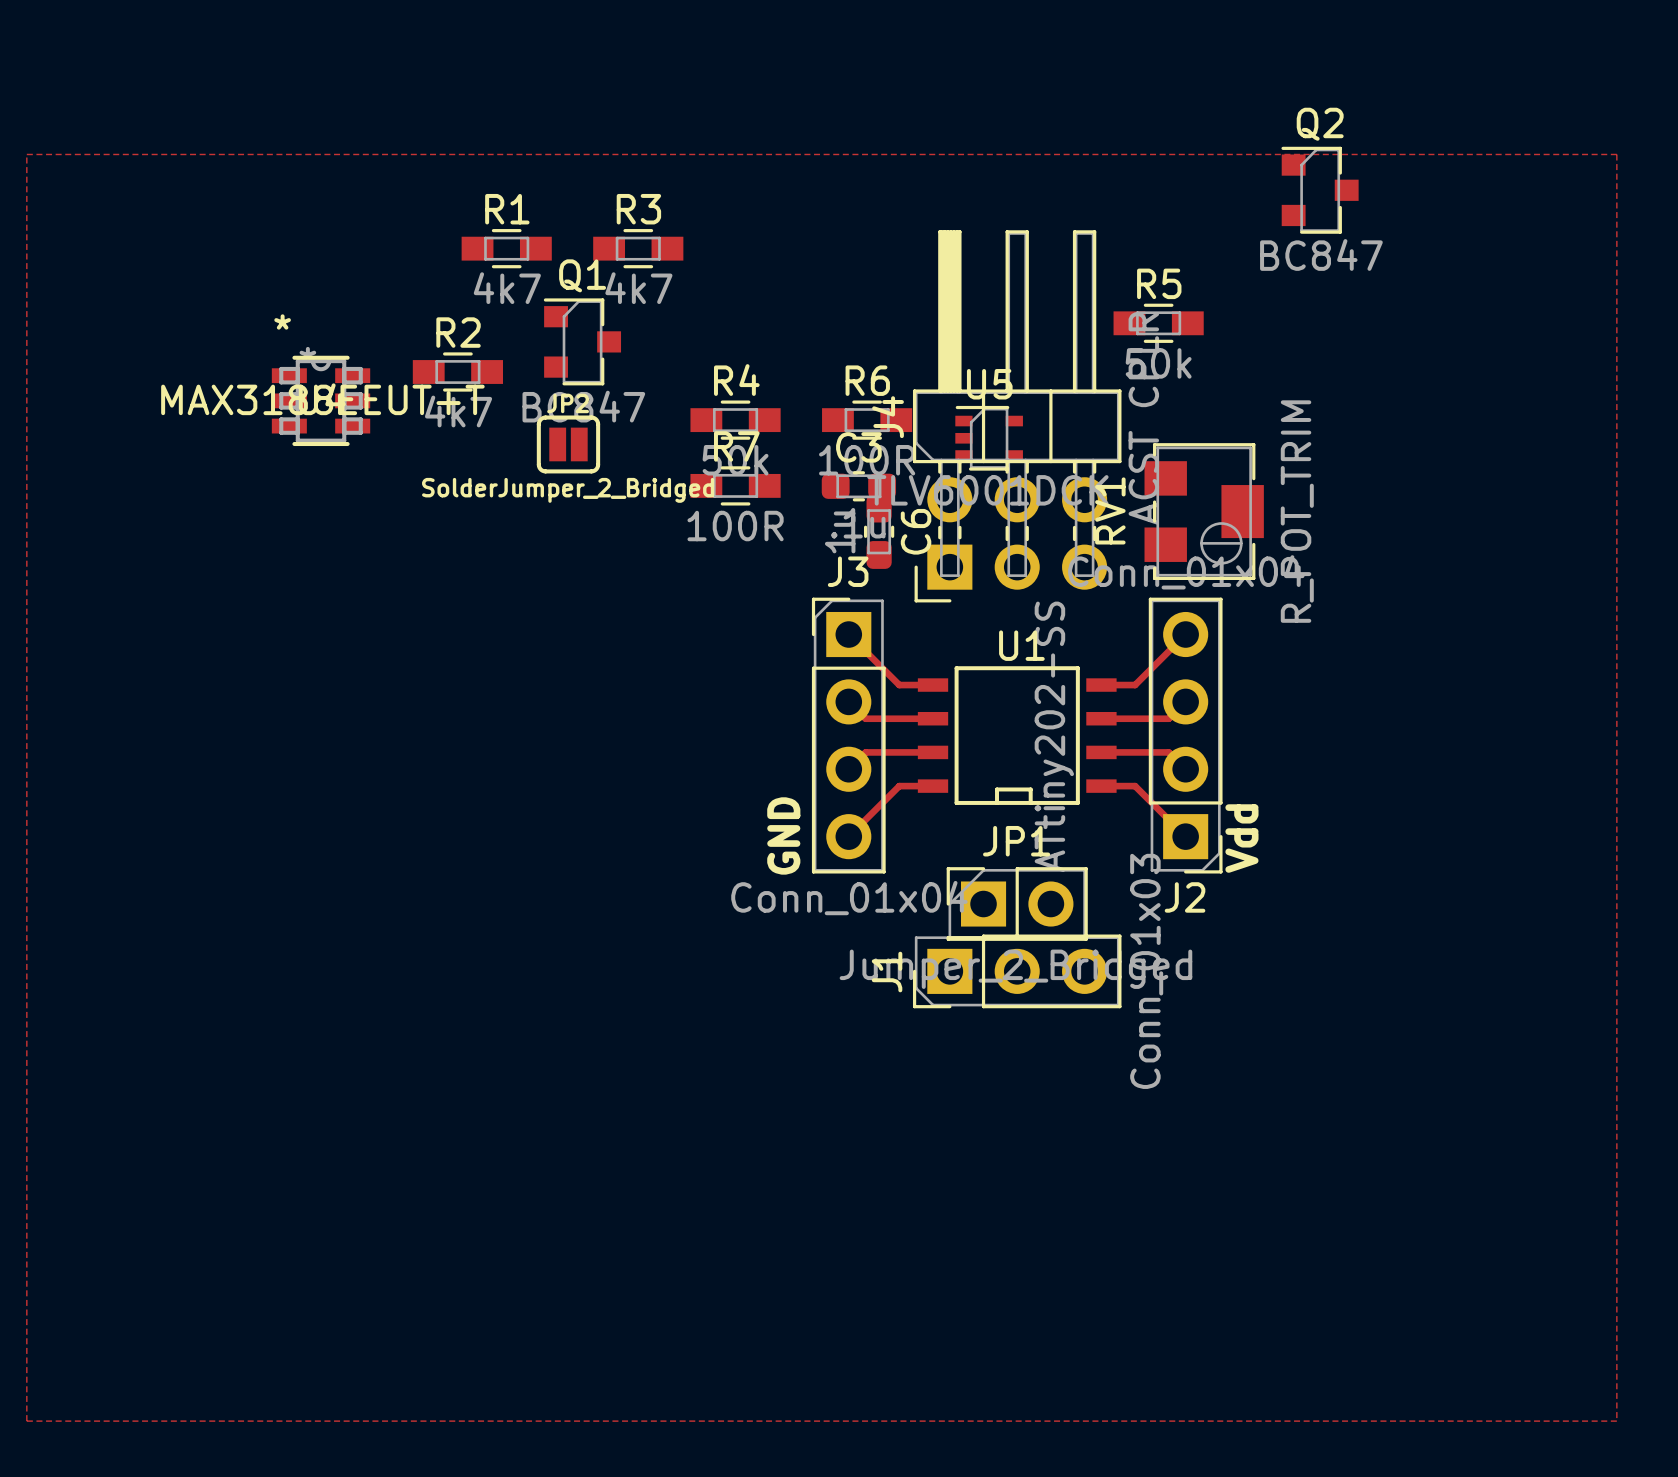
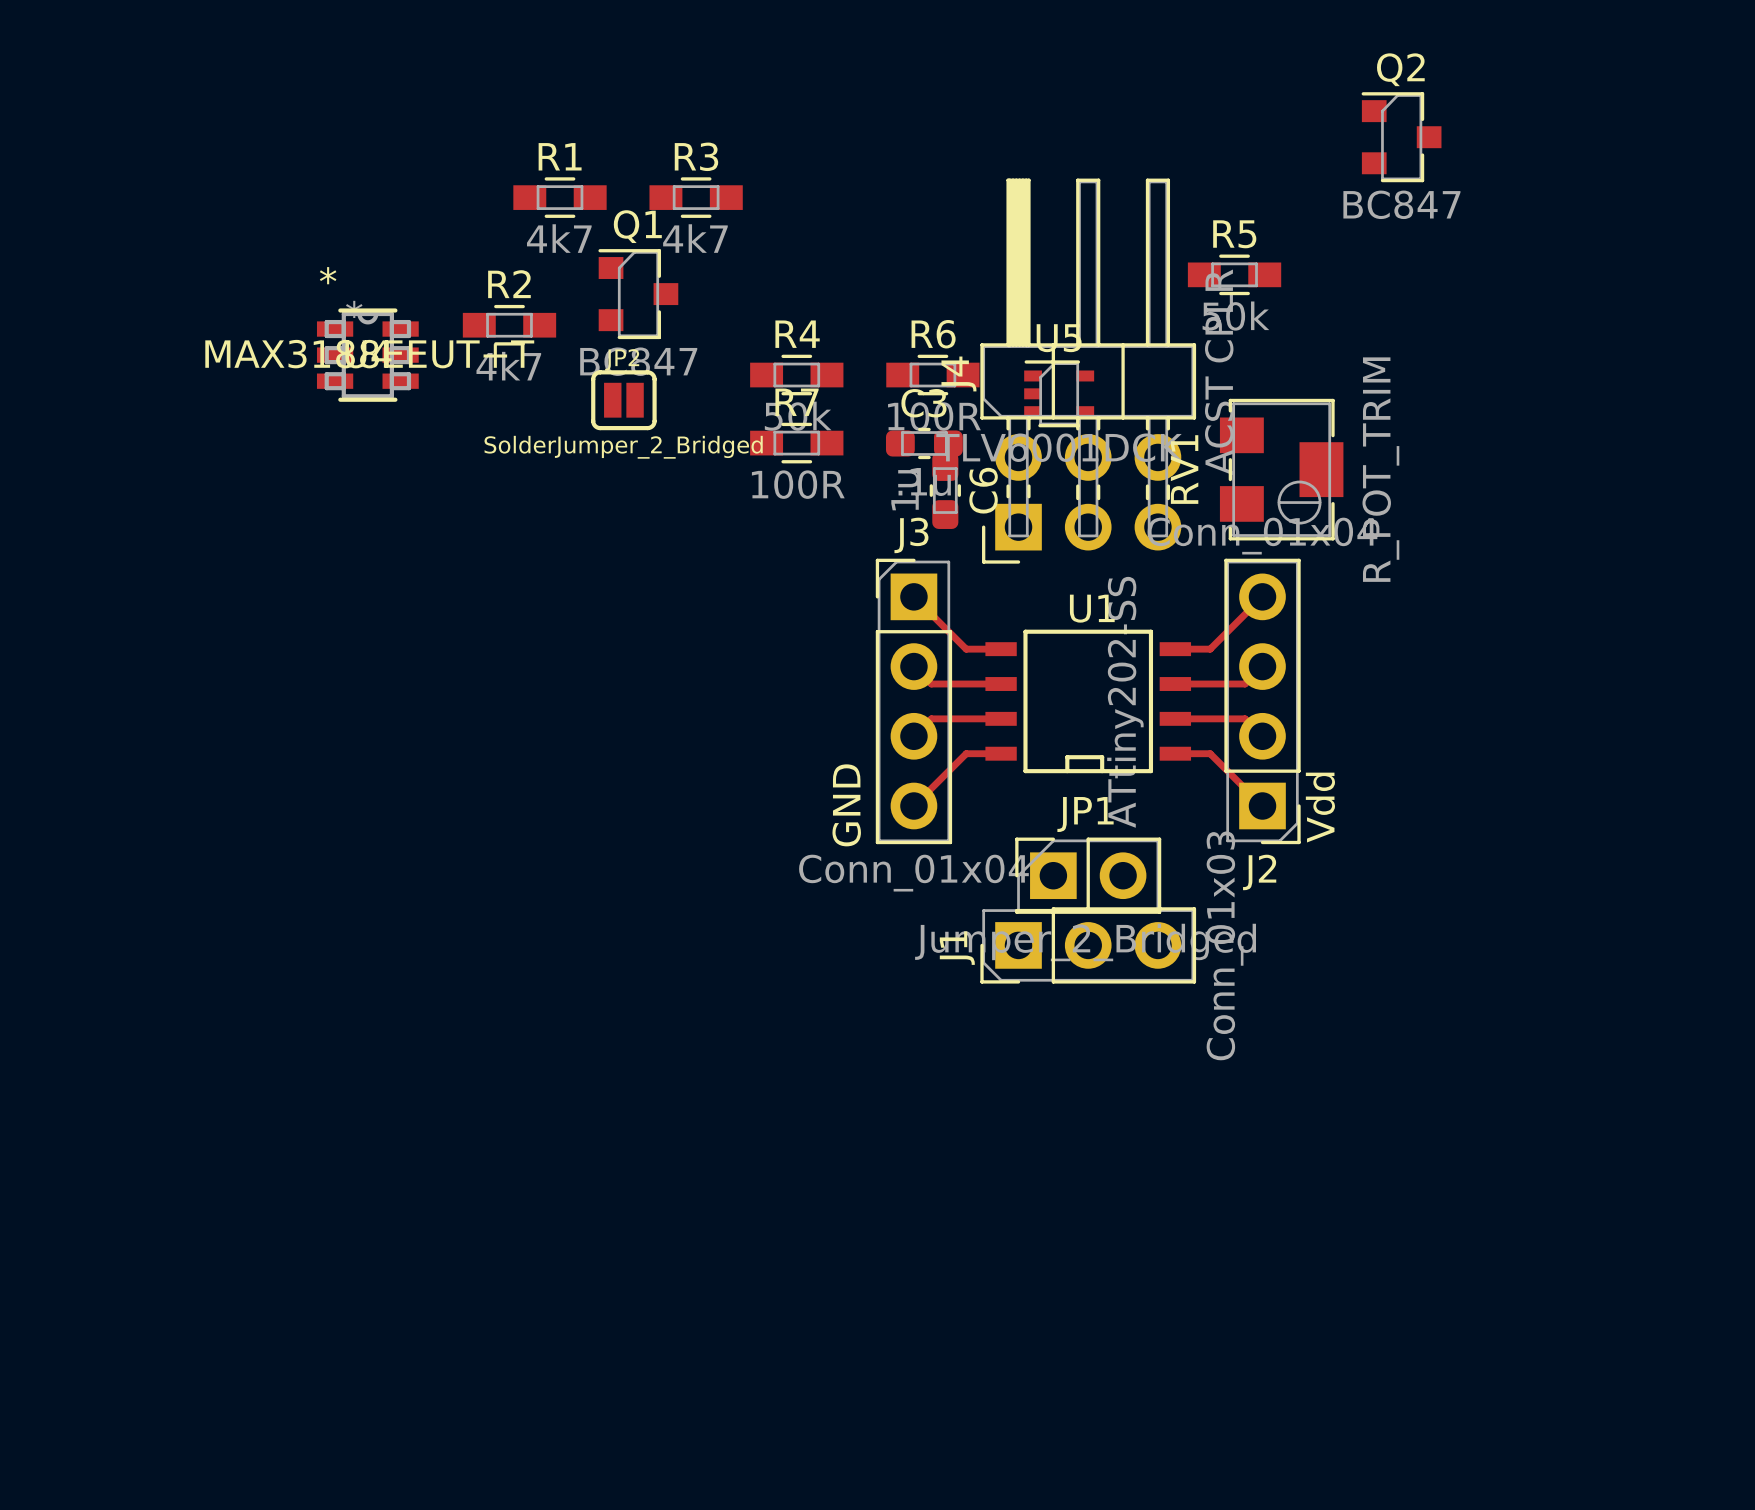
zone outline: (26, 154) (1616, 154) (1616, 1421) (26, 1421) (26, 154) -> none

